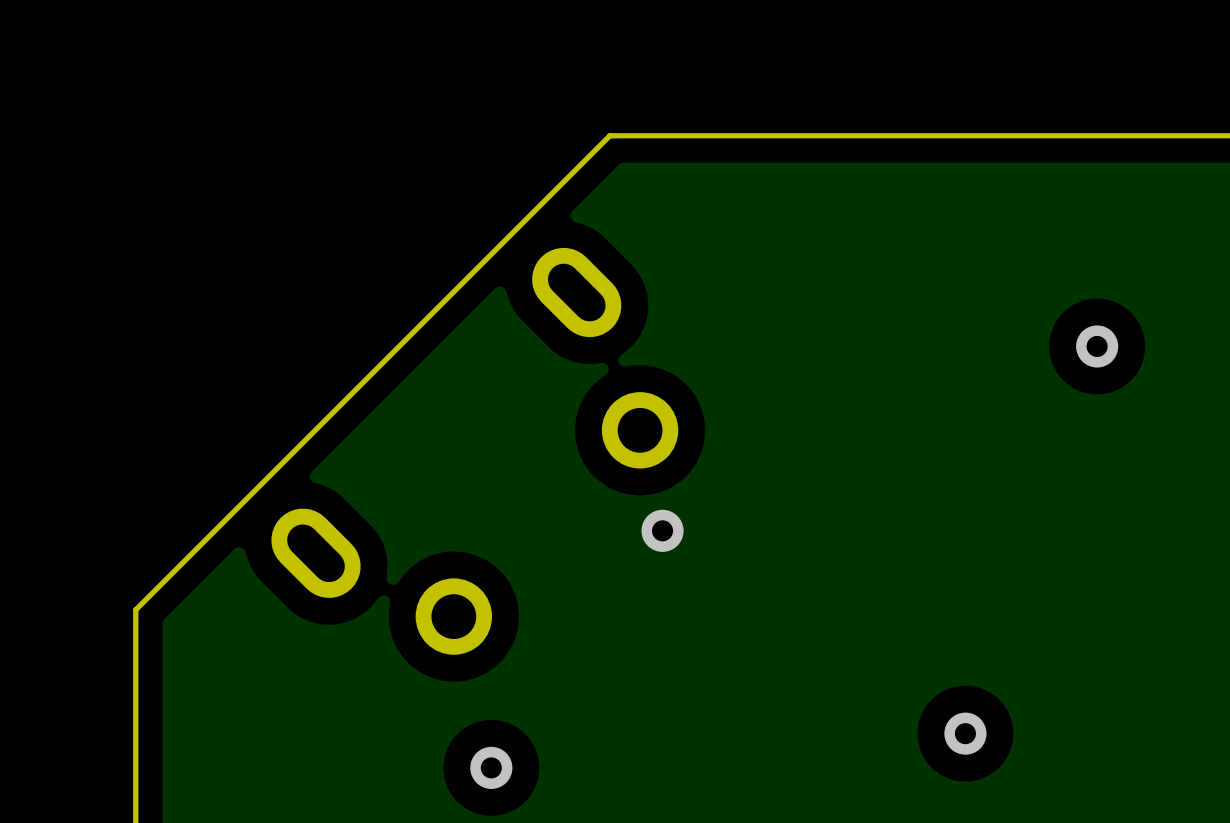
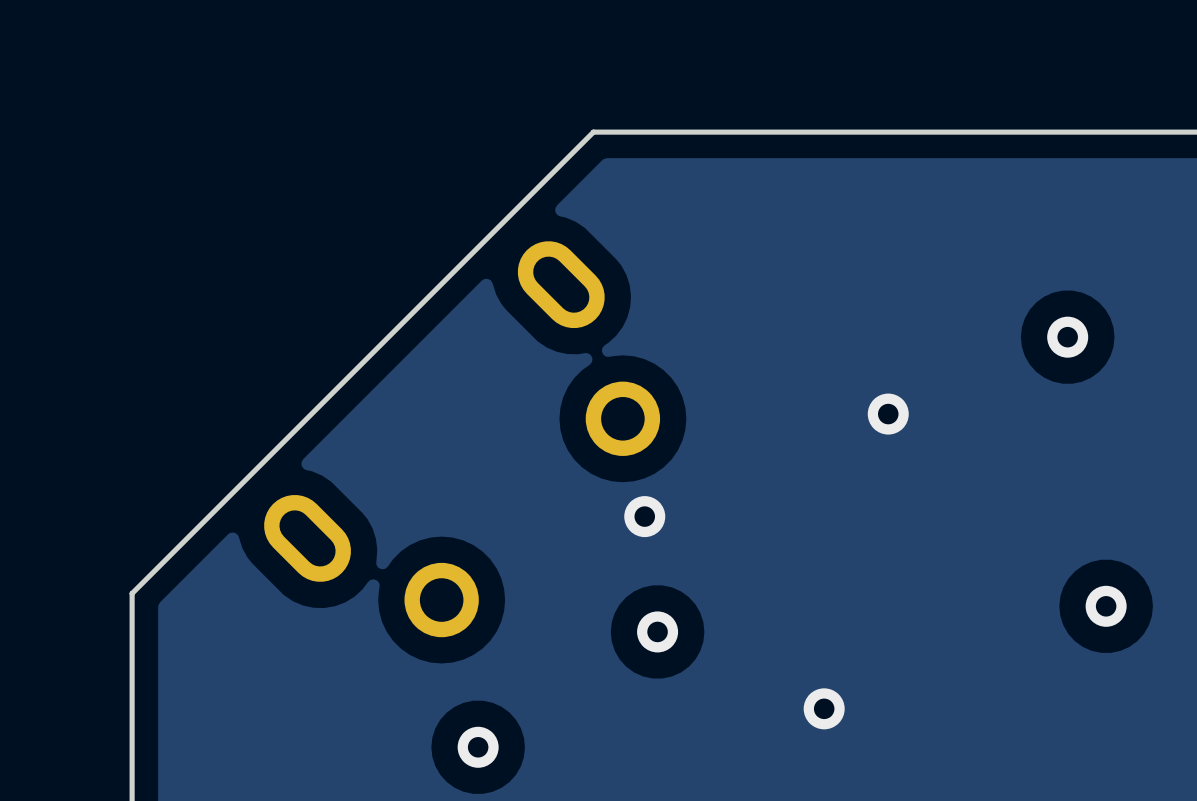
via: none -> (888, 414)
via: none -> (1106, 606)
via: none -> (657, 631)
via: none -> (824, 708)
via: (965, 733) -> none

